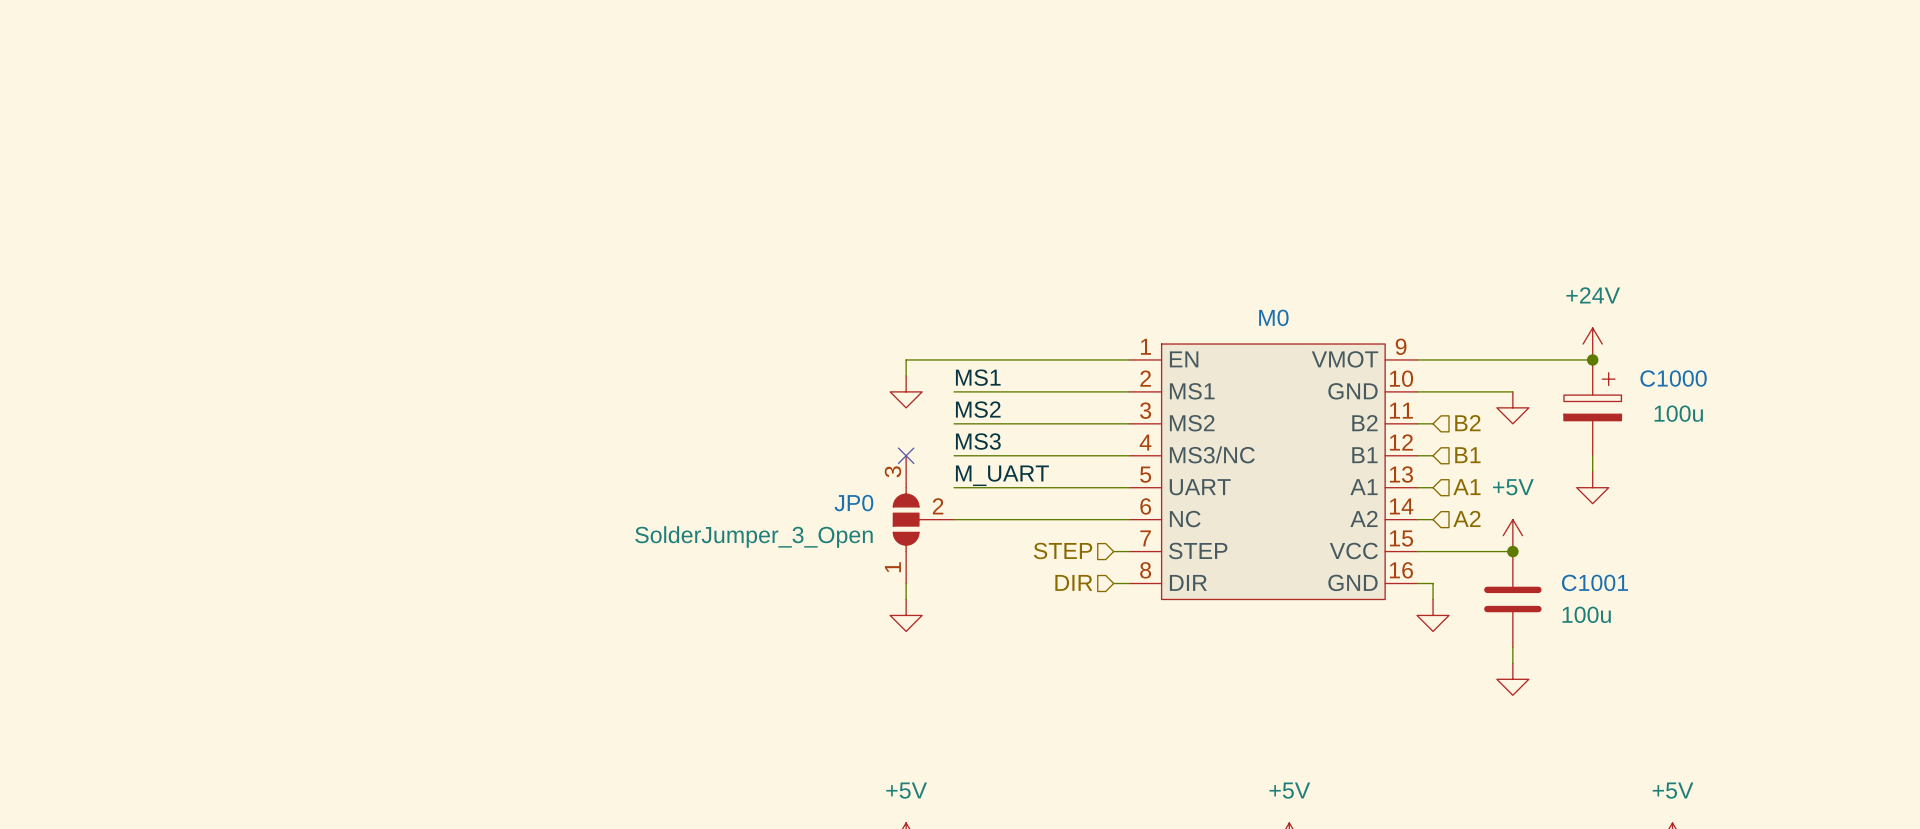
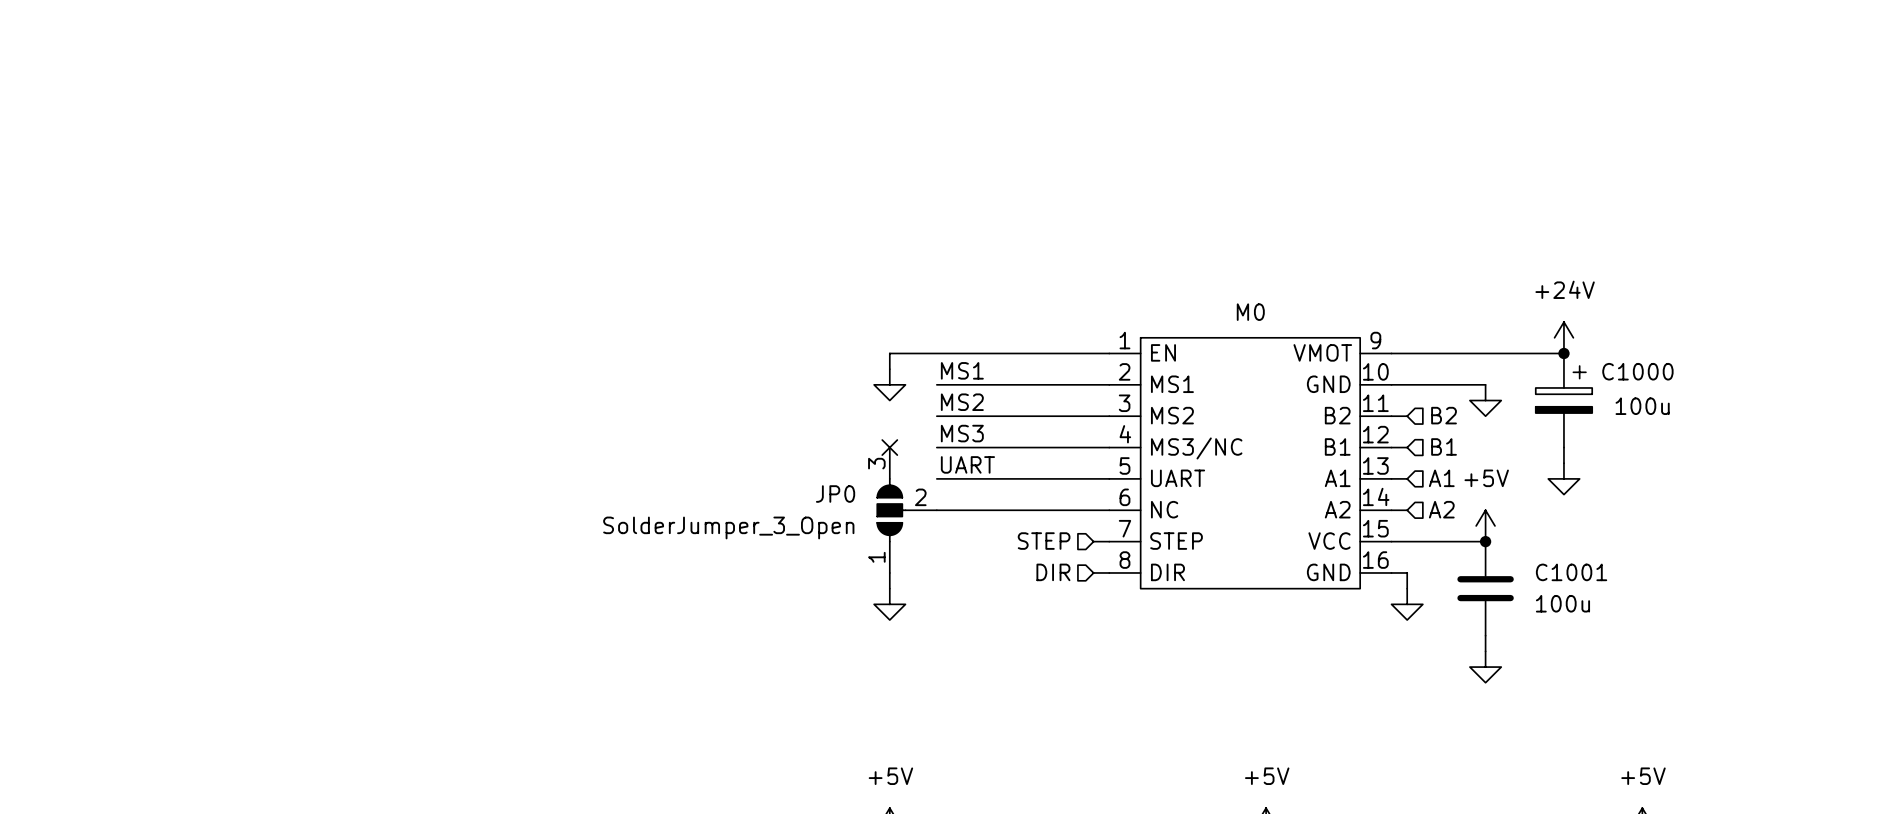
label: M_UART (1002, 475) -> UART (967, 464)

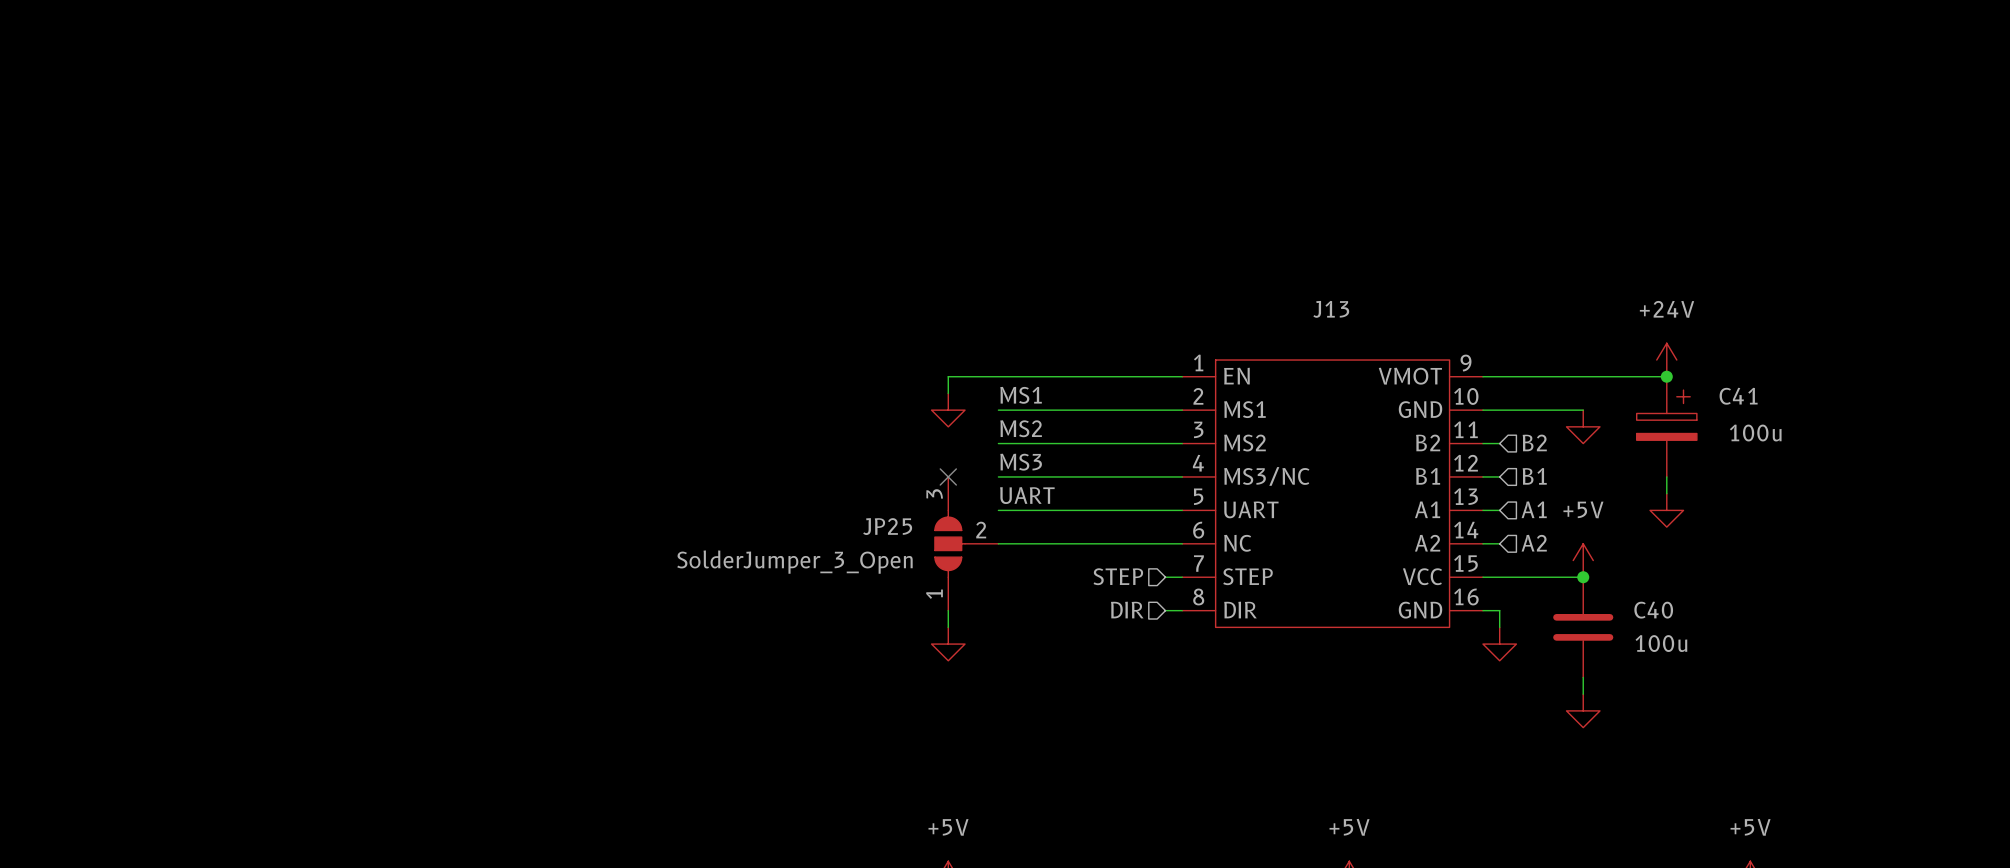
M0 name: M0 (1250, 312) -> J13 (1331, 309)
C1000 name: C1000 (1637, 371) -> C41 (1738, 396)
JP0 name: JP0 (835, 494) -> JP25 (887, 526)
C1001 name: C1001 (1571, 572) -> C40 (1653, 610)

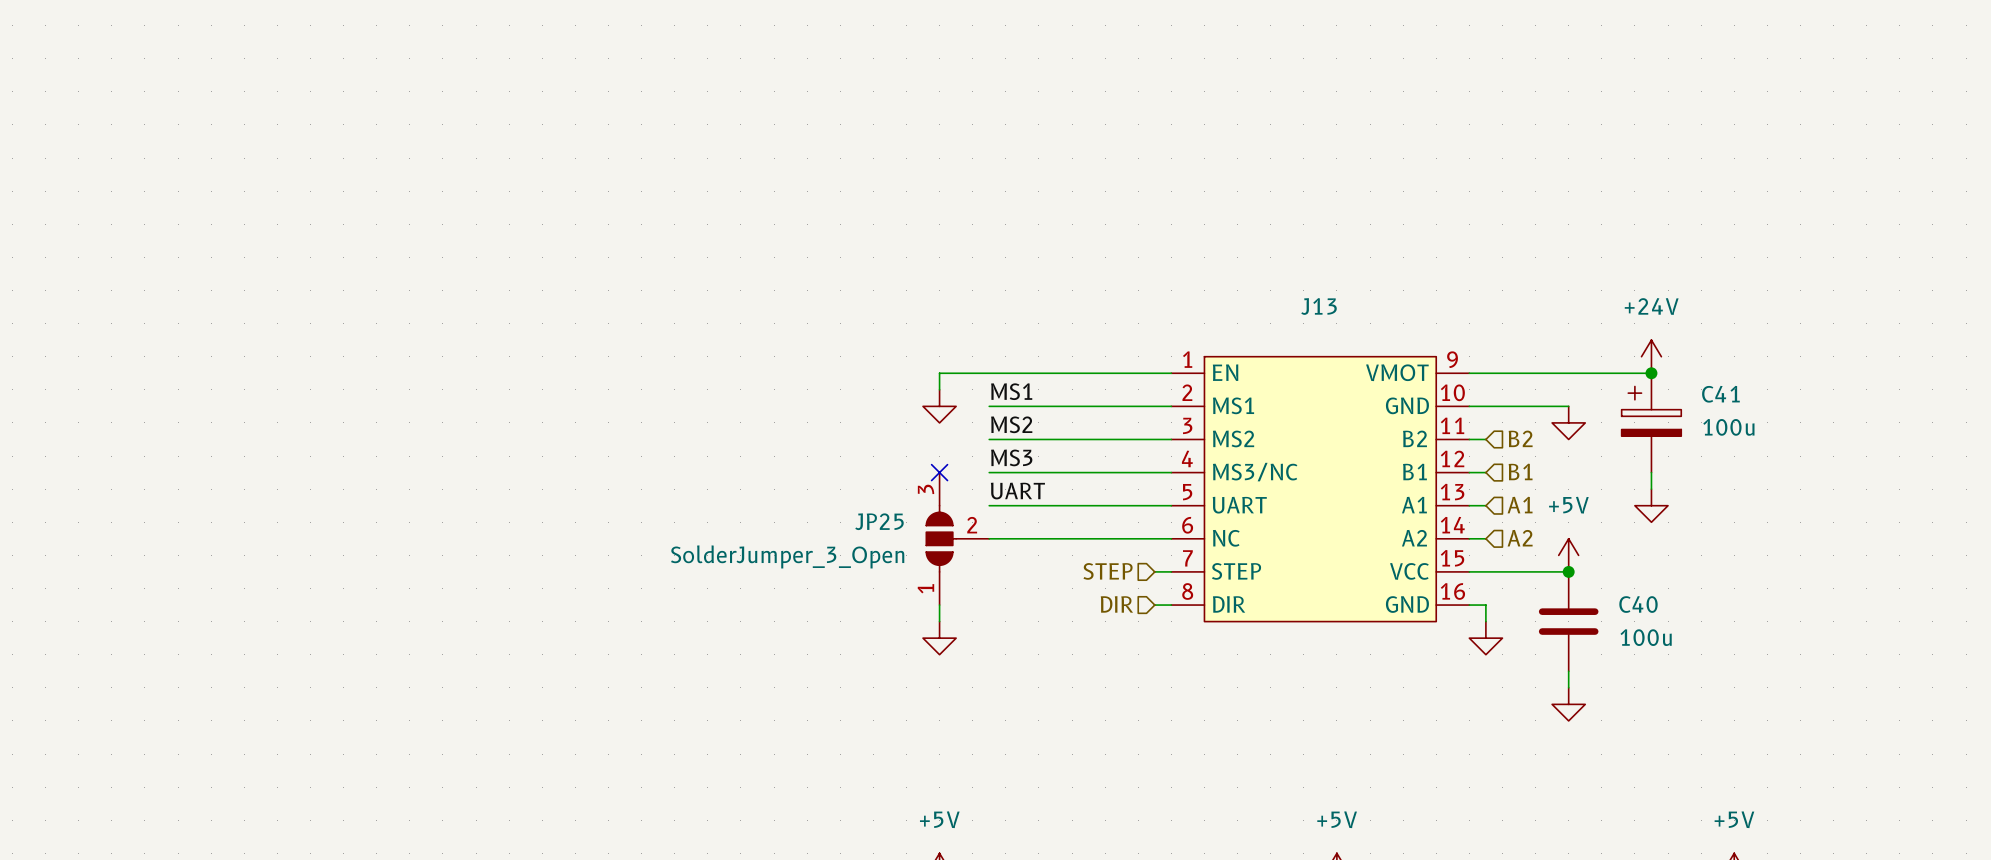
C41 flip: as is (1666, 415) -> left-right (1651, 411)

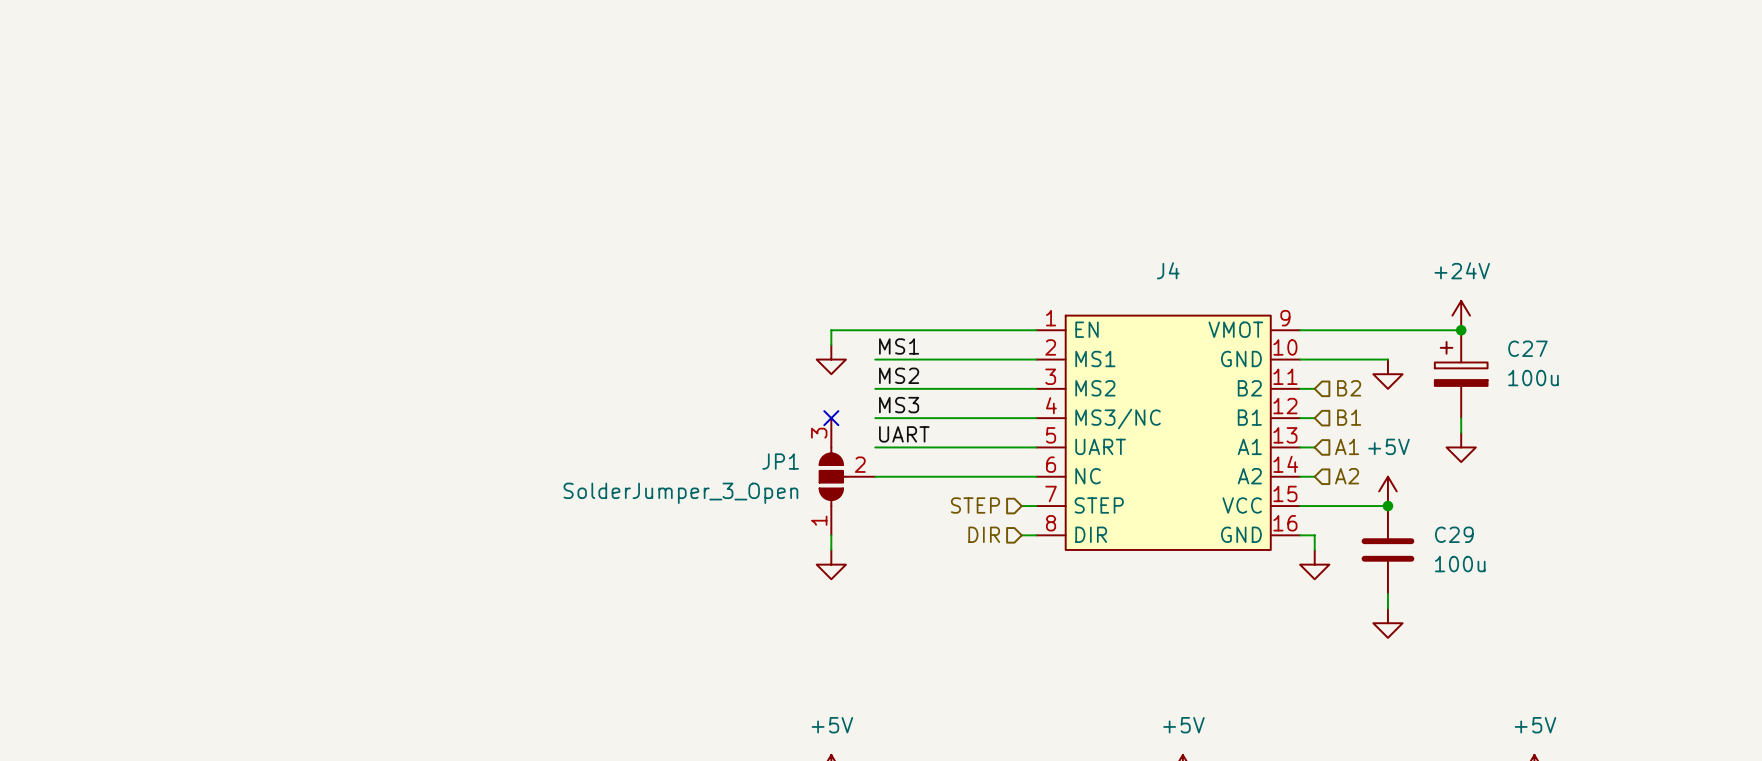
J13 name: J13 (1319, 306) -> J4 (1168, 270)
C41 name: C41 (1720, 394) -> C27 (1527, 348)
JP25 name: JP25 (879, 521) -> JP1 (780, 461)
C40 name: C40 (1638, 604) -> C29 (1454, 534)

